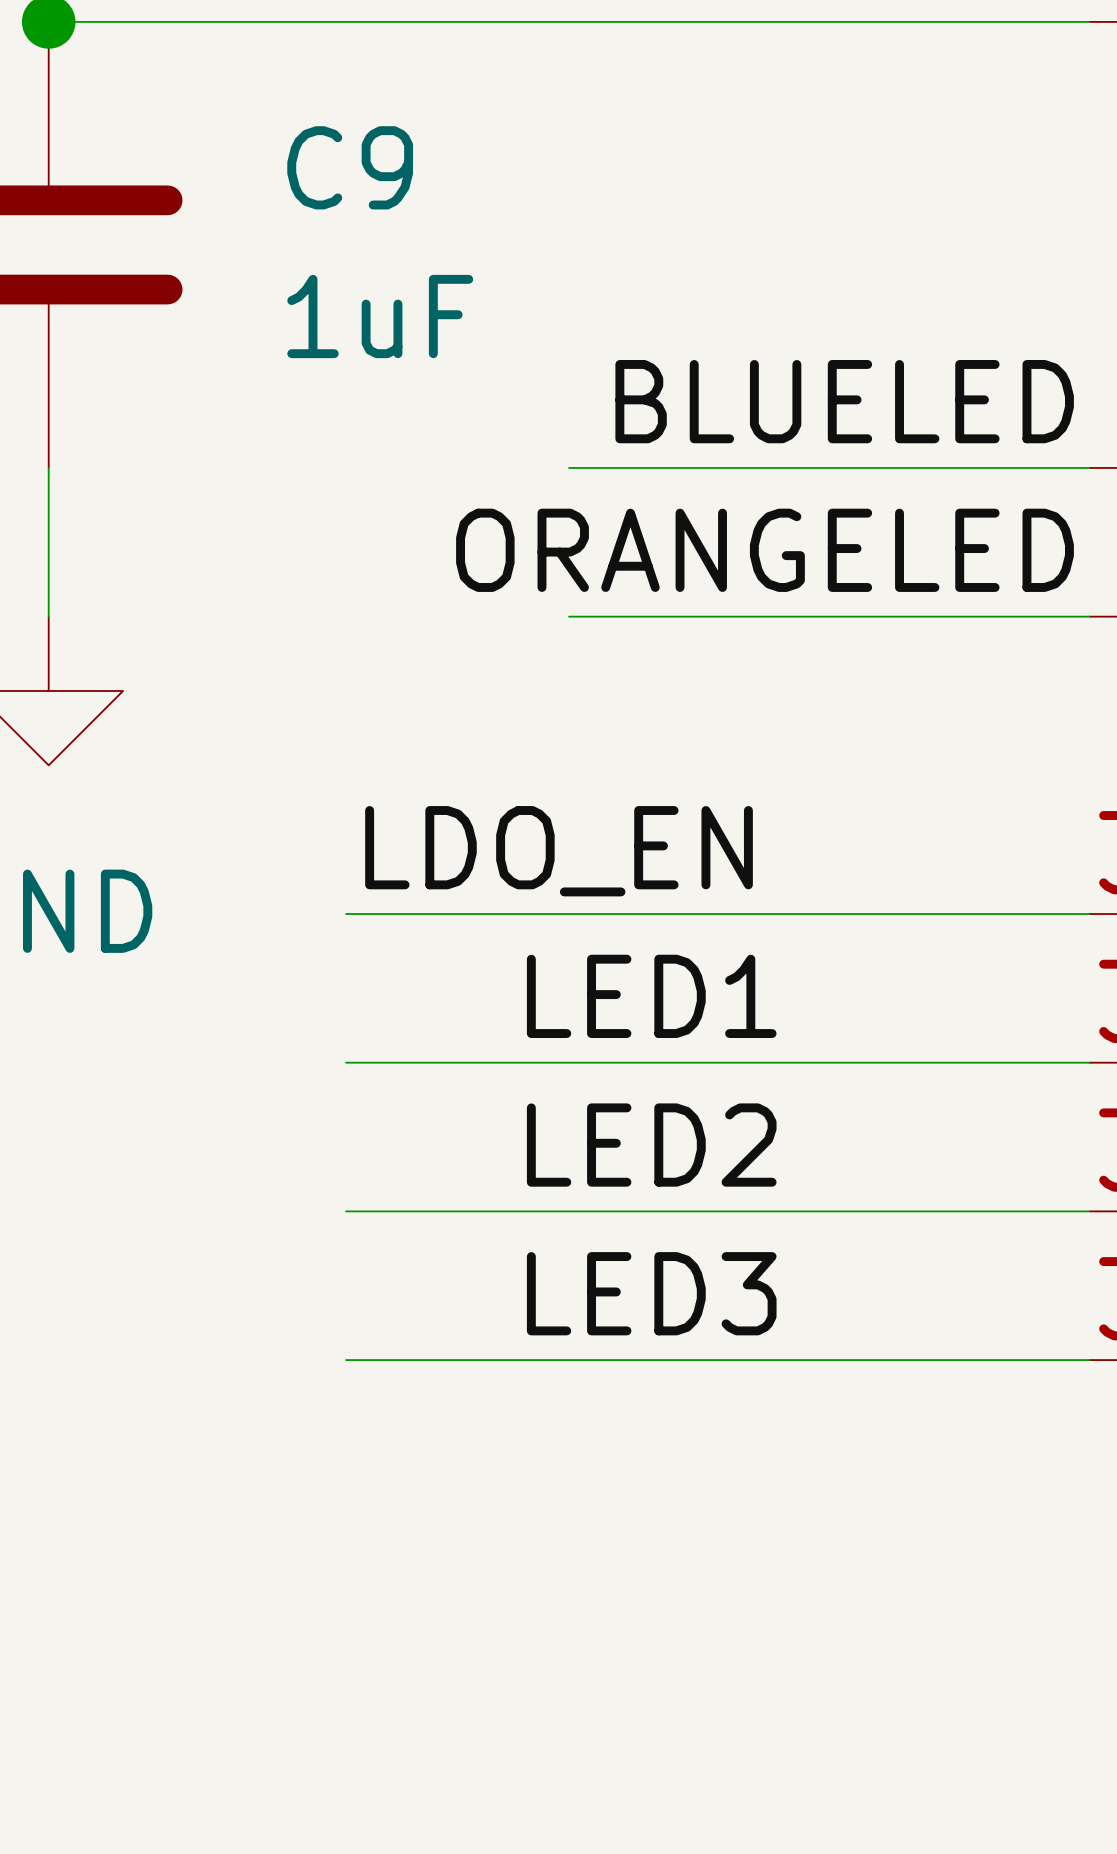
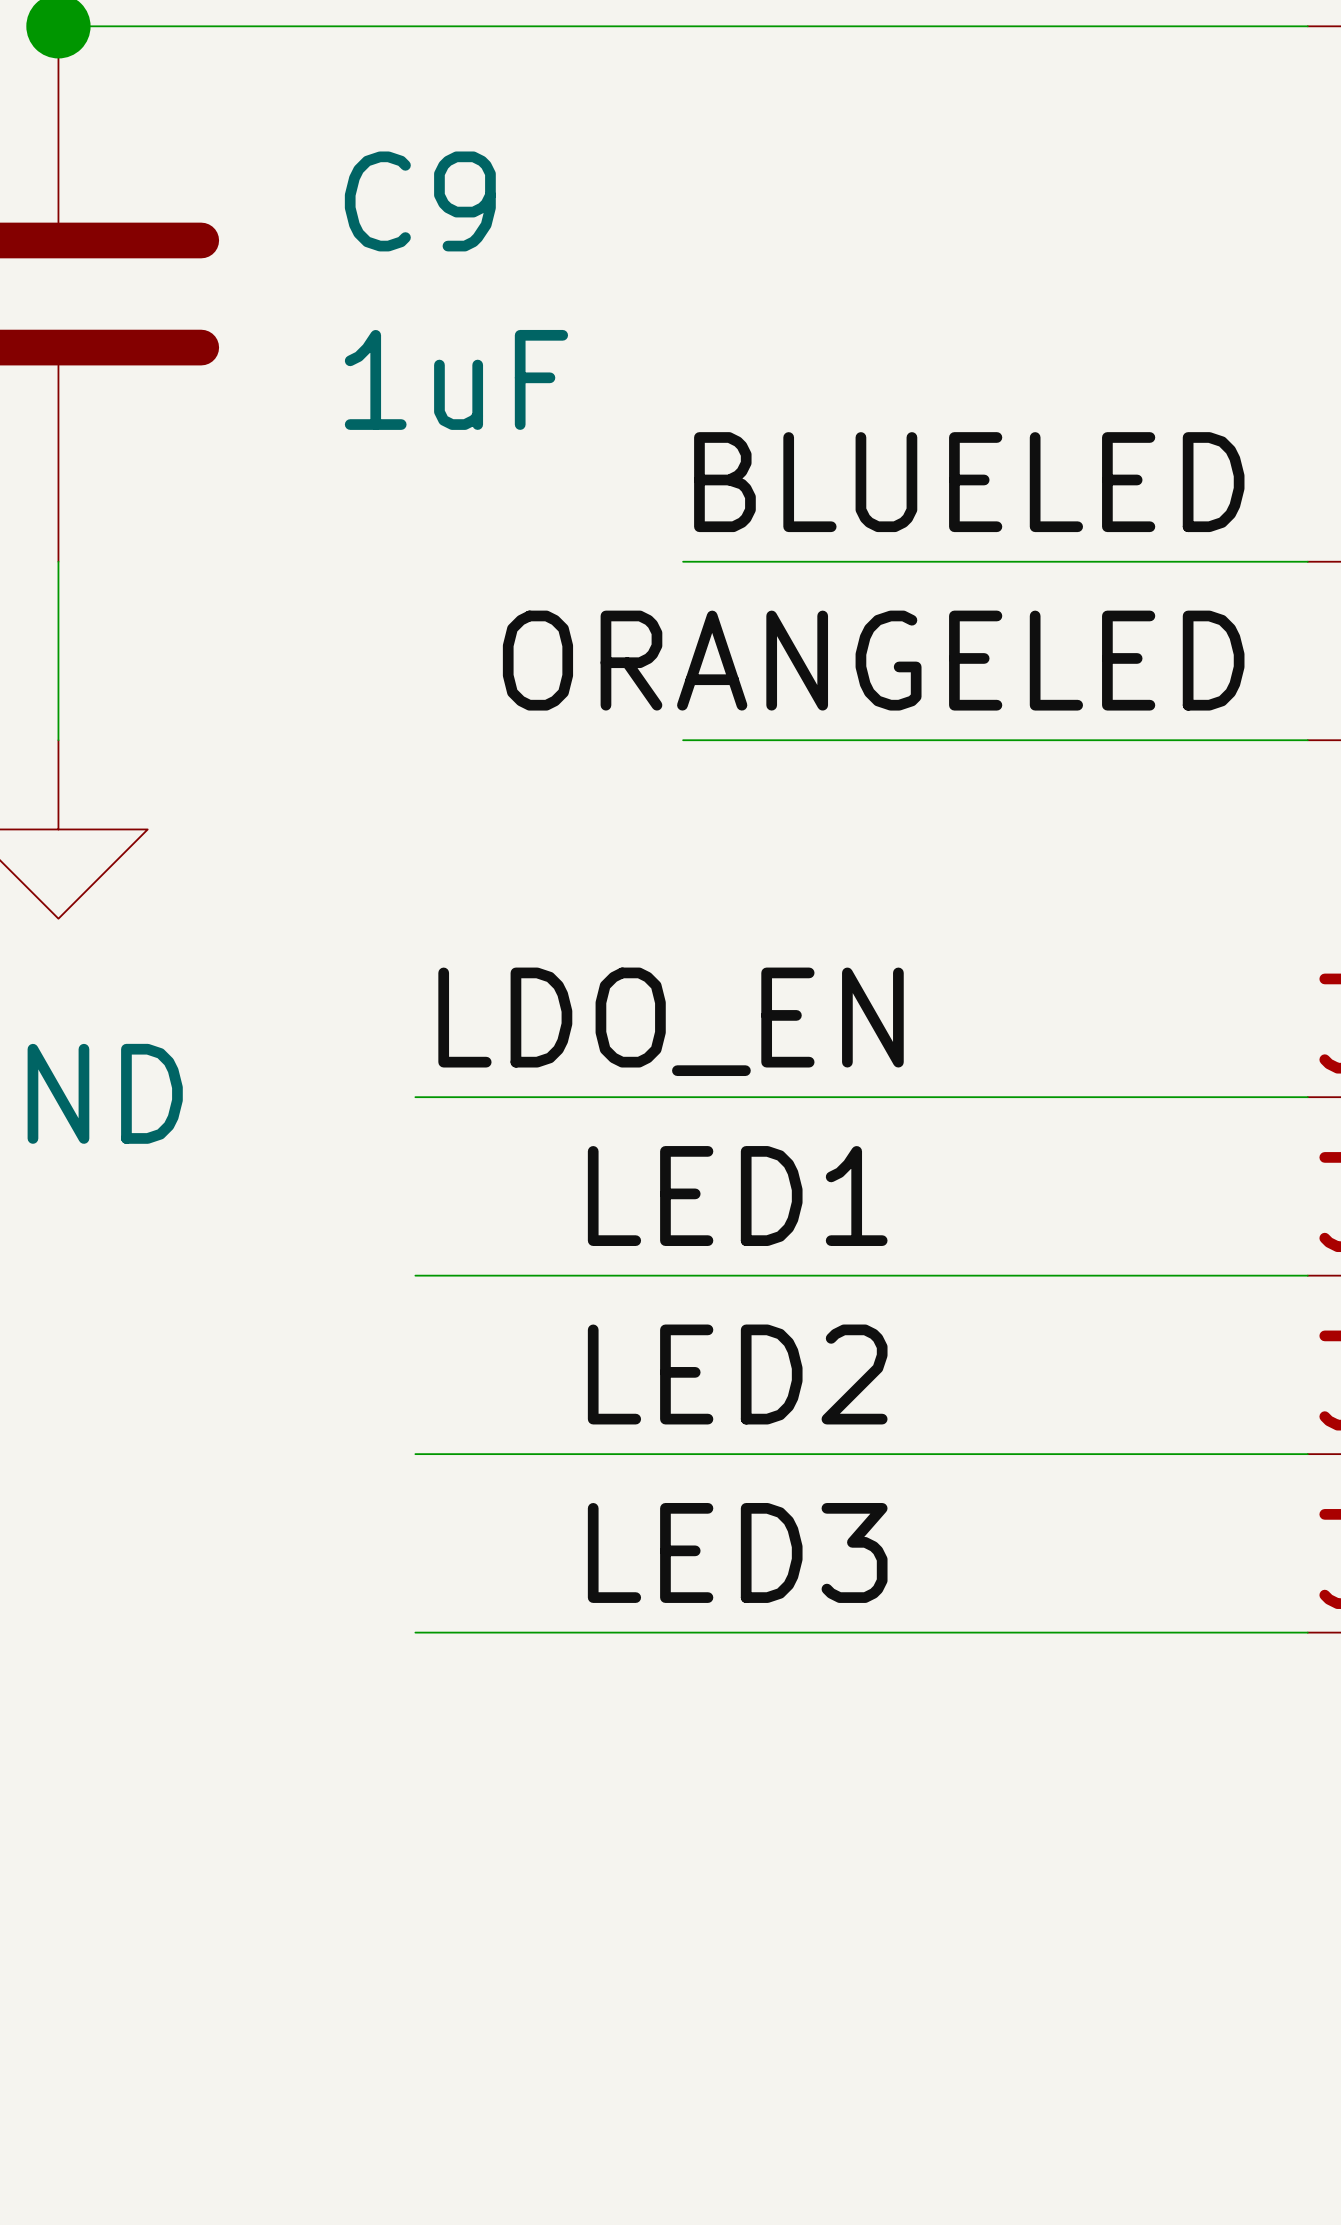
label position: BLUELED (844, 401) -> BLUELED (969, 482)
label position: ORANGELED (765, 550) -> ORANGELED (873, 660)
label position: LED1 (651, 996) -> LED1 (737, 1196)
label position: LED2 (651, 1145) -> LED2 (737, 1374)
label position: LED3 (651, 1293) -> LED3 (737, 1552)

